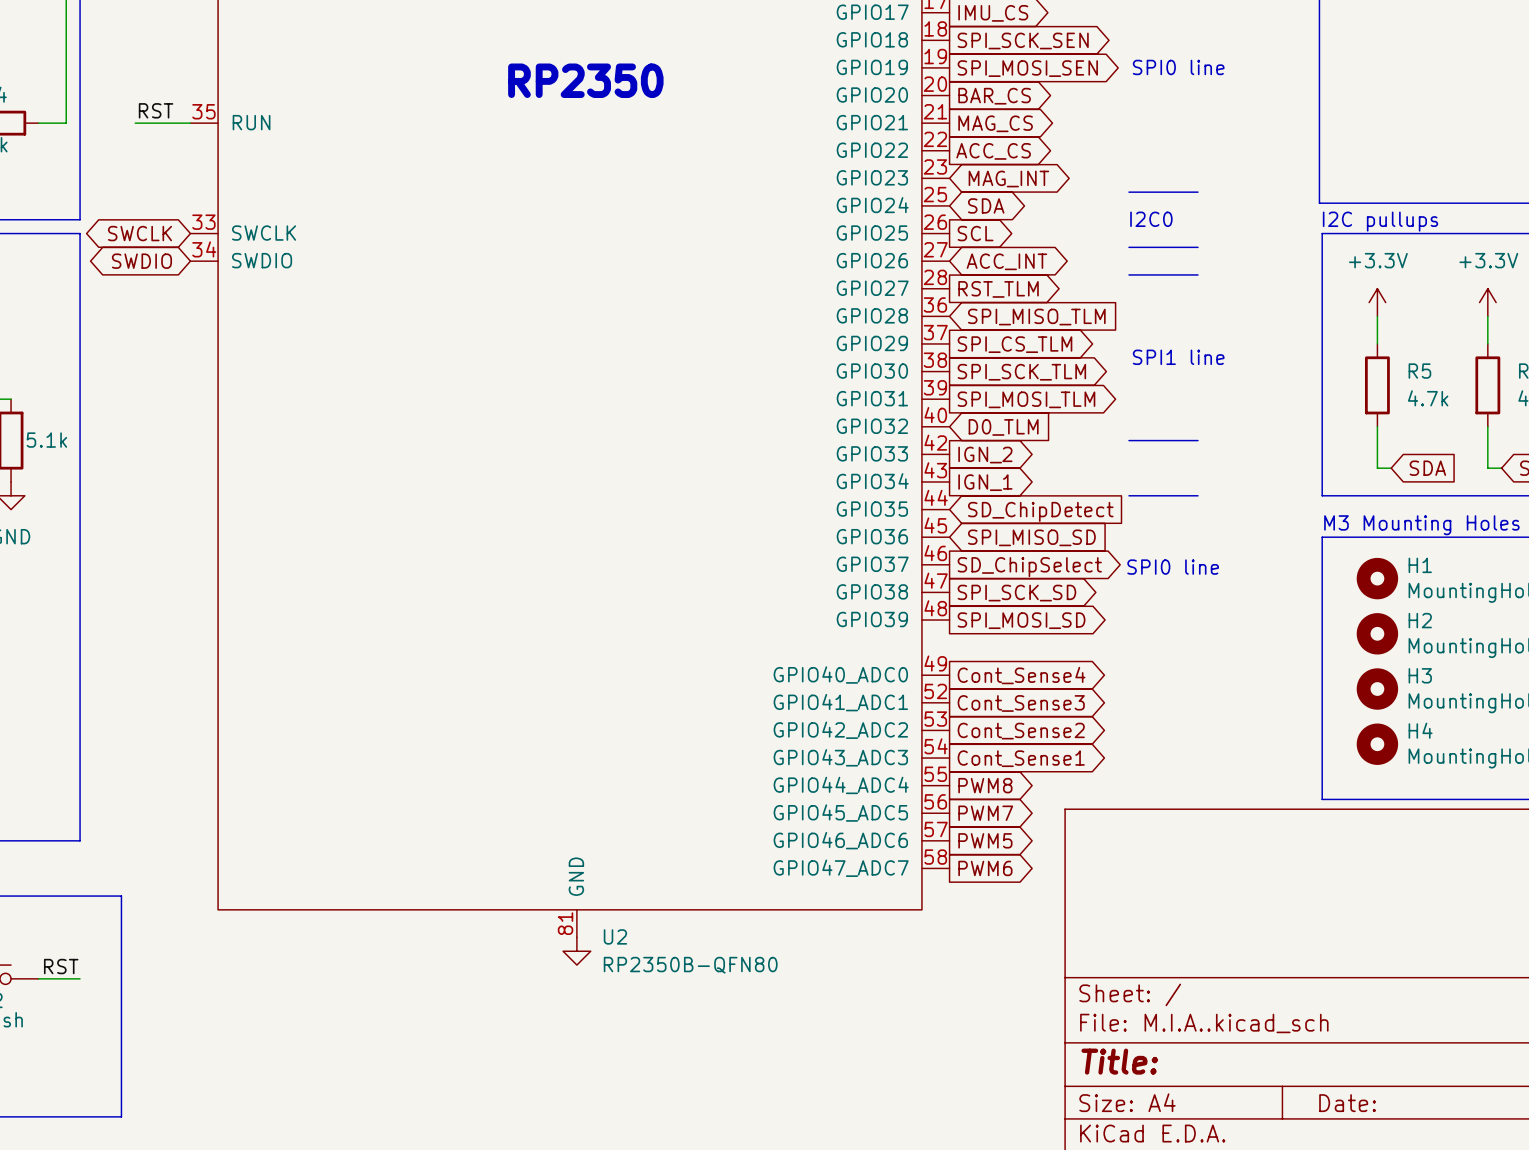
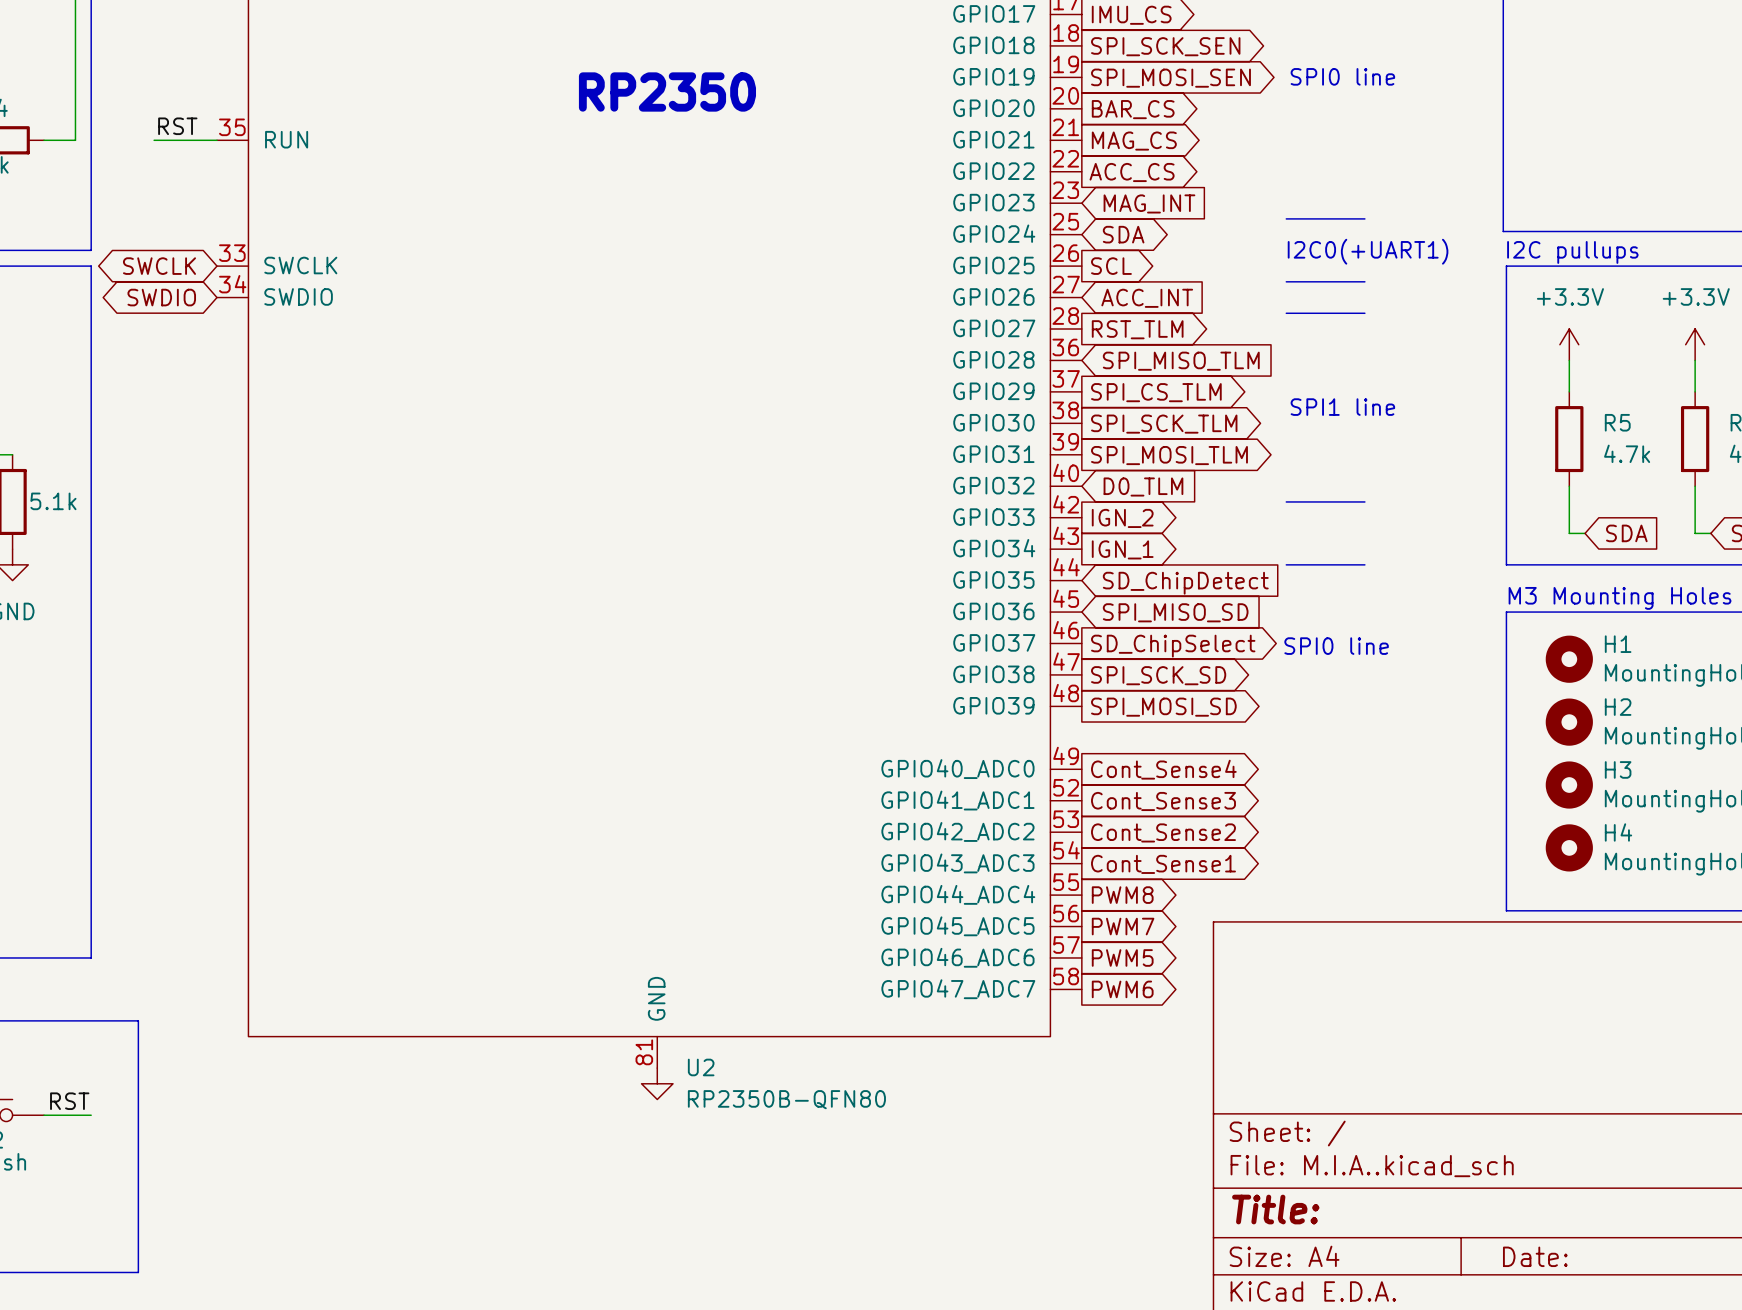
global label shape: bidirectional (1008, 179) -> input (1149, 203)
text: none -> I2C0(+UART1) (1368, 251)
global label shape: bidirectional (1006, 261) -> input (1147, 298)

